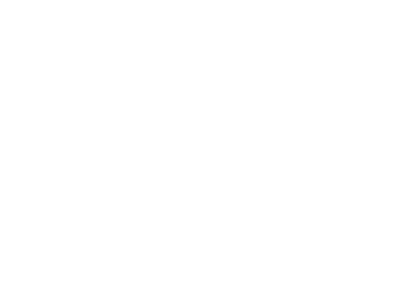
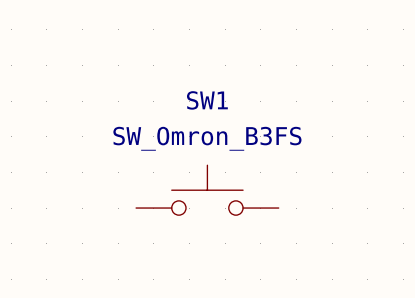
SW1: none -> SW_Omron_B3FS (207, 190)

